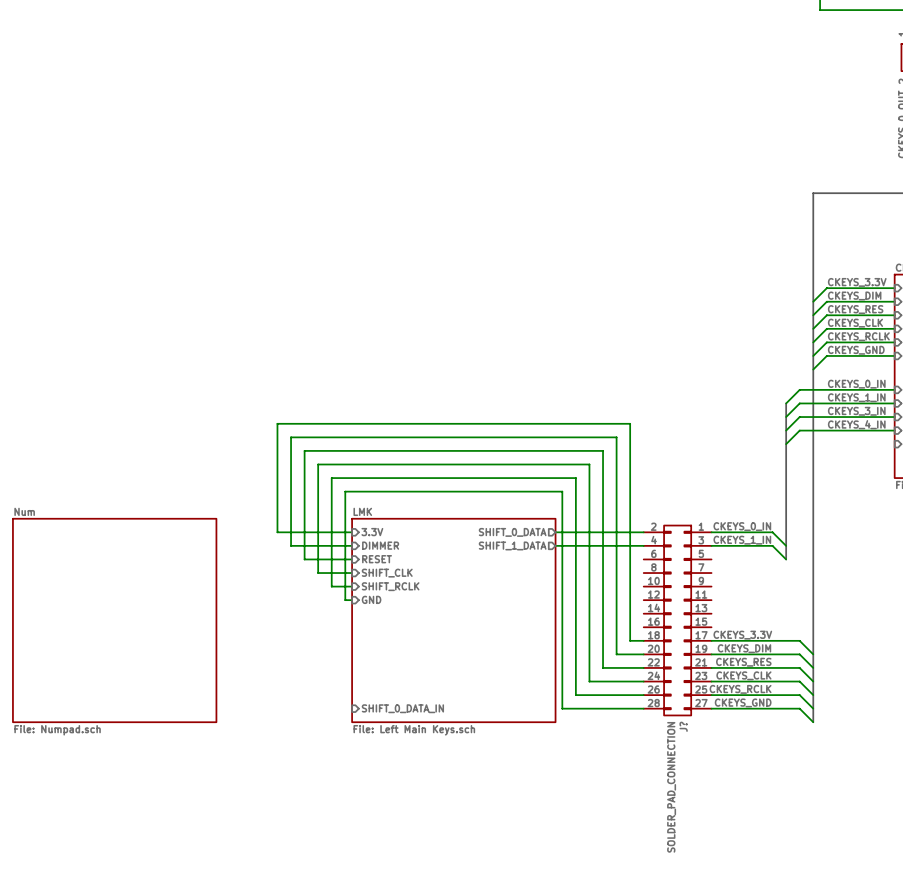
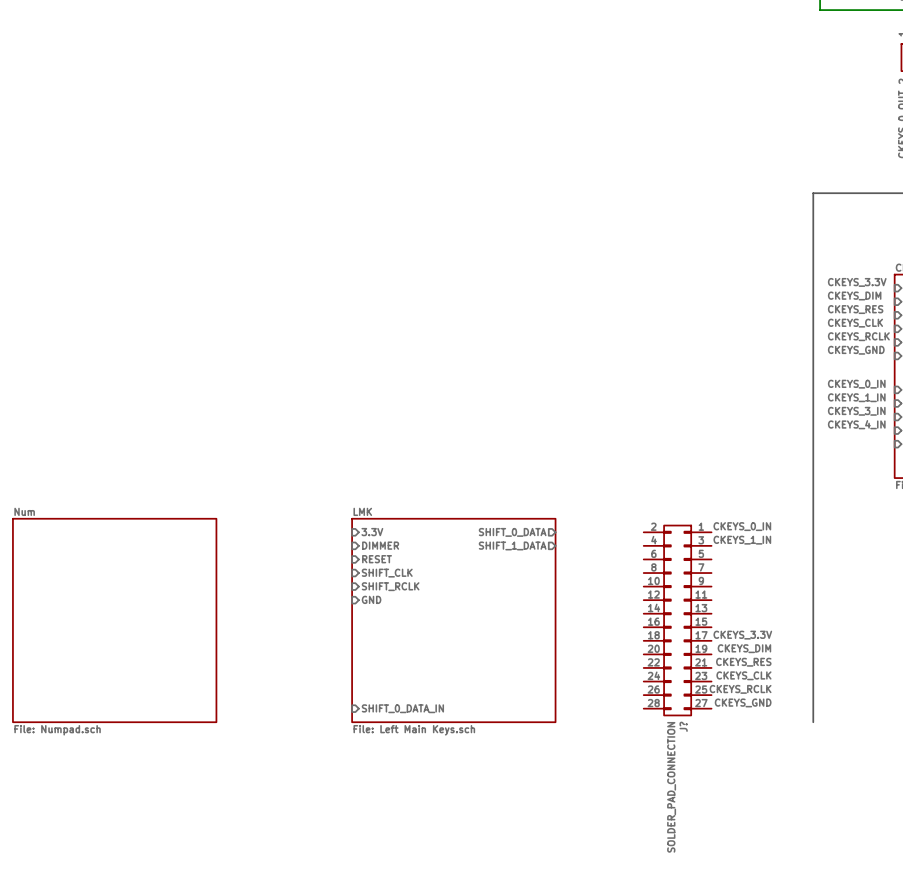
wire: (894, 288) (826, 288) (813, 301) -> none
wire: (894, 301) (826, 301) (813, 315) -> none
wire: (894, 315) (826, 315) (813, 328) -> none
wire: (894, 328) (826, 328) (813, 342) -> none
wire: (894, 342) (826, 342) (813, 355) -> none
wire: (894, 355) (826, 355) (813, 369) -> none
wire: (894, 389) (799, 389) (786, 403) -> none
bus: (786, 403) (786, 559) -> none
wire: (894, 403) (799, 403) (786, 417) -> none
wire: (894, 417) (799, 417) (786, 430) -> none
wire: (894, 430) (799, 430) (786, 444) -> none
wire: (352, 532) (277, 532) (277, 423) (630, 423) (630, 640) (643, 640) -> none
wire: (555, 532) (643, 532) -> none
wire: (711, 532) (772, 532) (786, 545) -> none
wire: (352, 545) (291, 545) (291, 437) (616, 437) (616, 654) (643, 654) -> none
wire: (555, 545) (643, 545) -> none
wire: (711, 545) (772, 545) (786, 559) -> none
wire: (352, 559) (304, 559) (304, 450) (603, 450) (603, 667) (643, 667) -> none
wire: (352, 573) (318, 573) (318, 464) (589, 464) (589, 681) (643, 681) -> none
wire: (352, 586) (331, 586) (331, 478) (575, 478) (575, 695) (643, 695) -> none
wire: (352, 600) (345, 600) (345, 491) (562, 491) (562, 708) (643, 708) -> none
wire: (711, 640) (799, 640) (813, 654) -> none
wire: (711, 654) (799, 654) (813, 667) -> none
wire: (711, 667) (799, 667) (813, 681) -> none
wire: (711, 681) (799, 681) (813, 695) -> none
wire: (711, 695) (799, 695) (813, 708) -> none
wire: (711, 708) (799, 708) (813, 722) -> none

